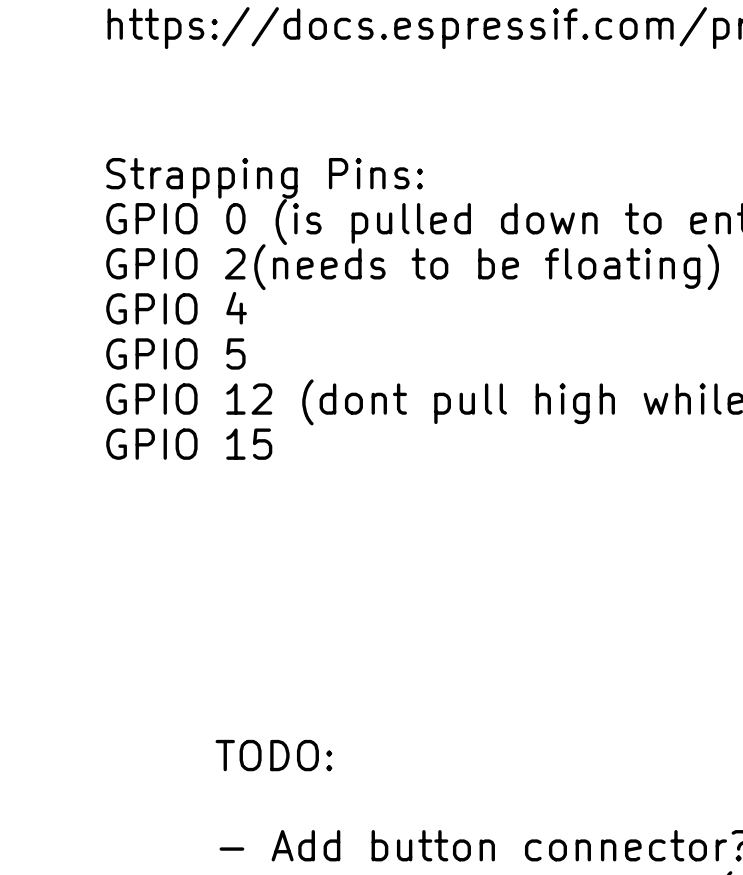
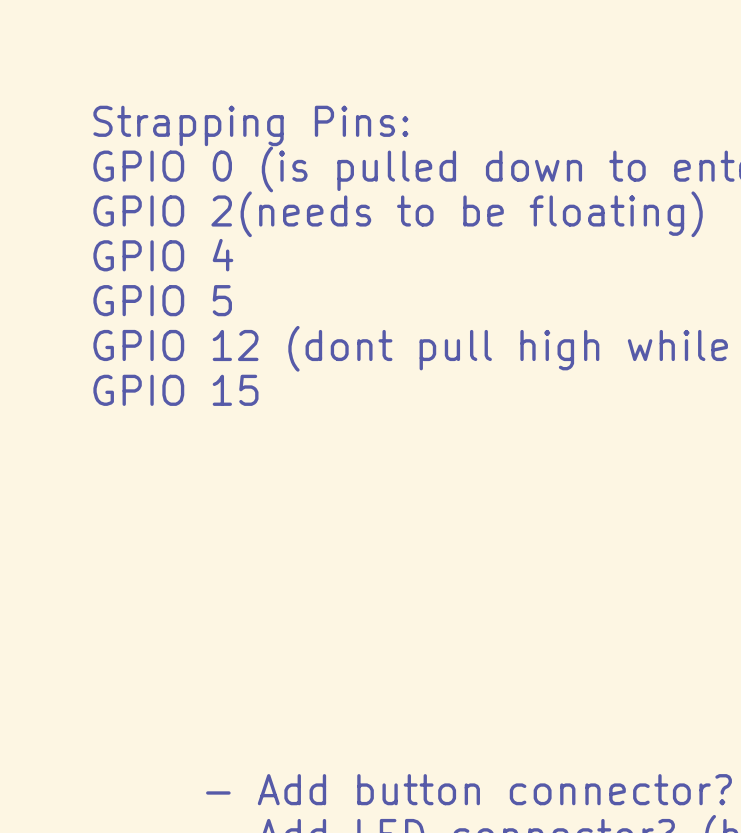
text: TODO: (273, 755) -> none

